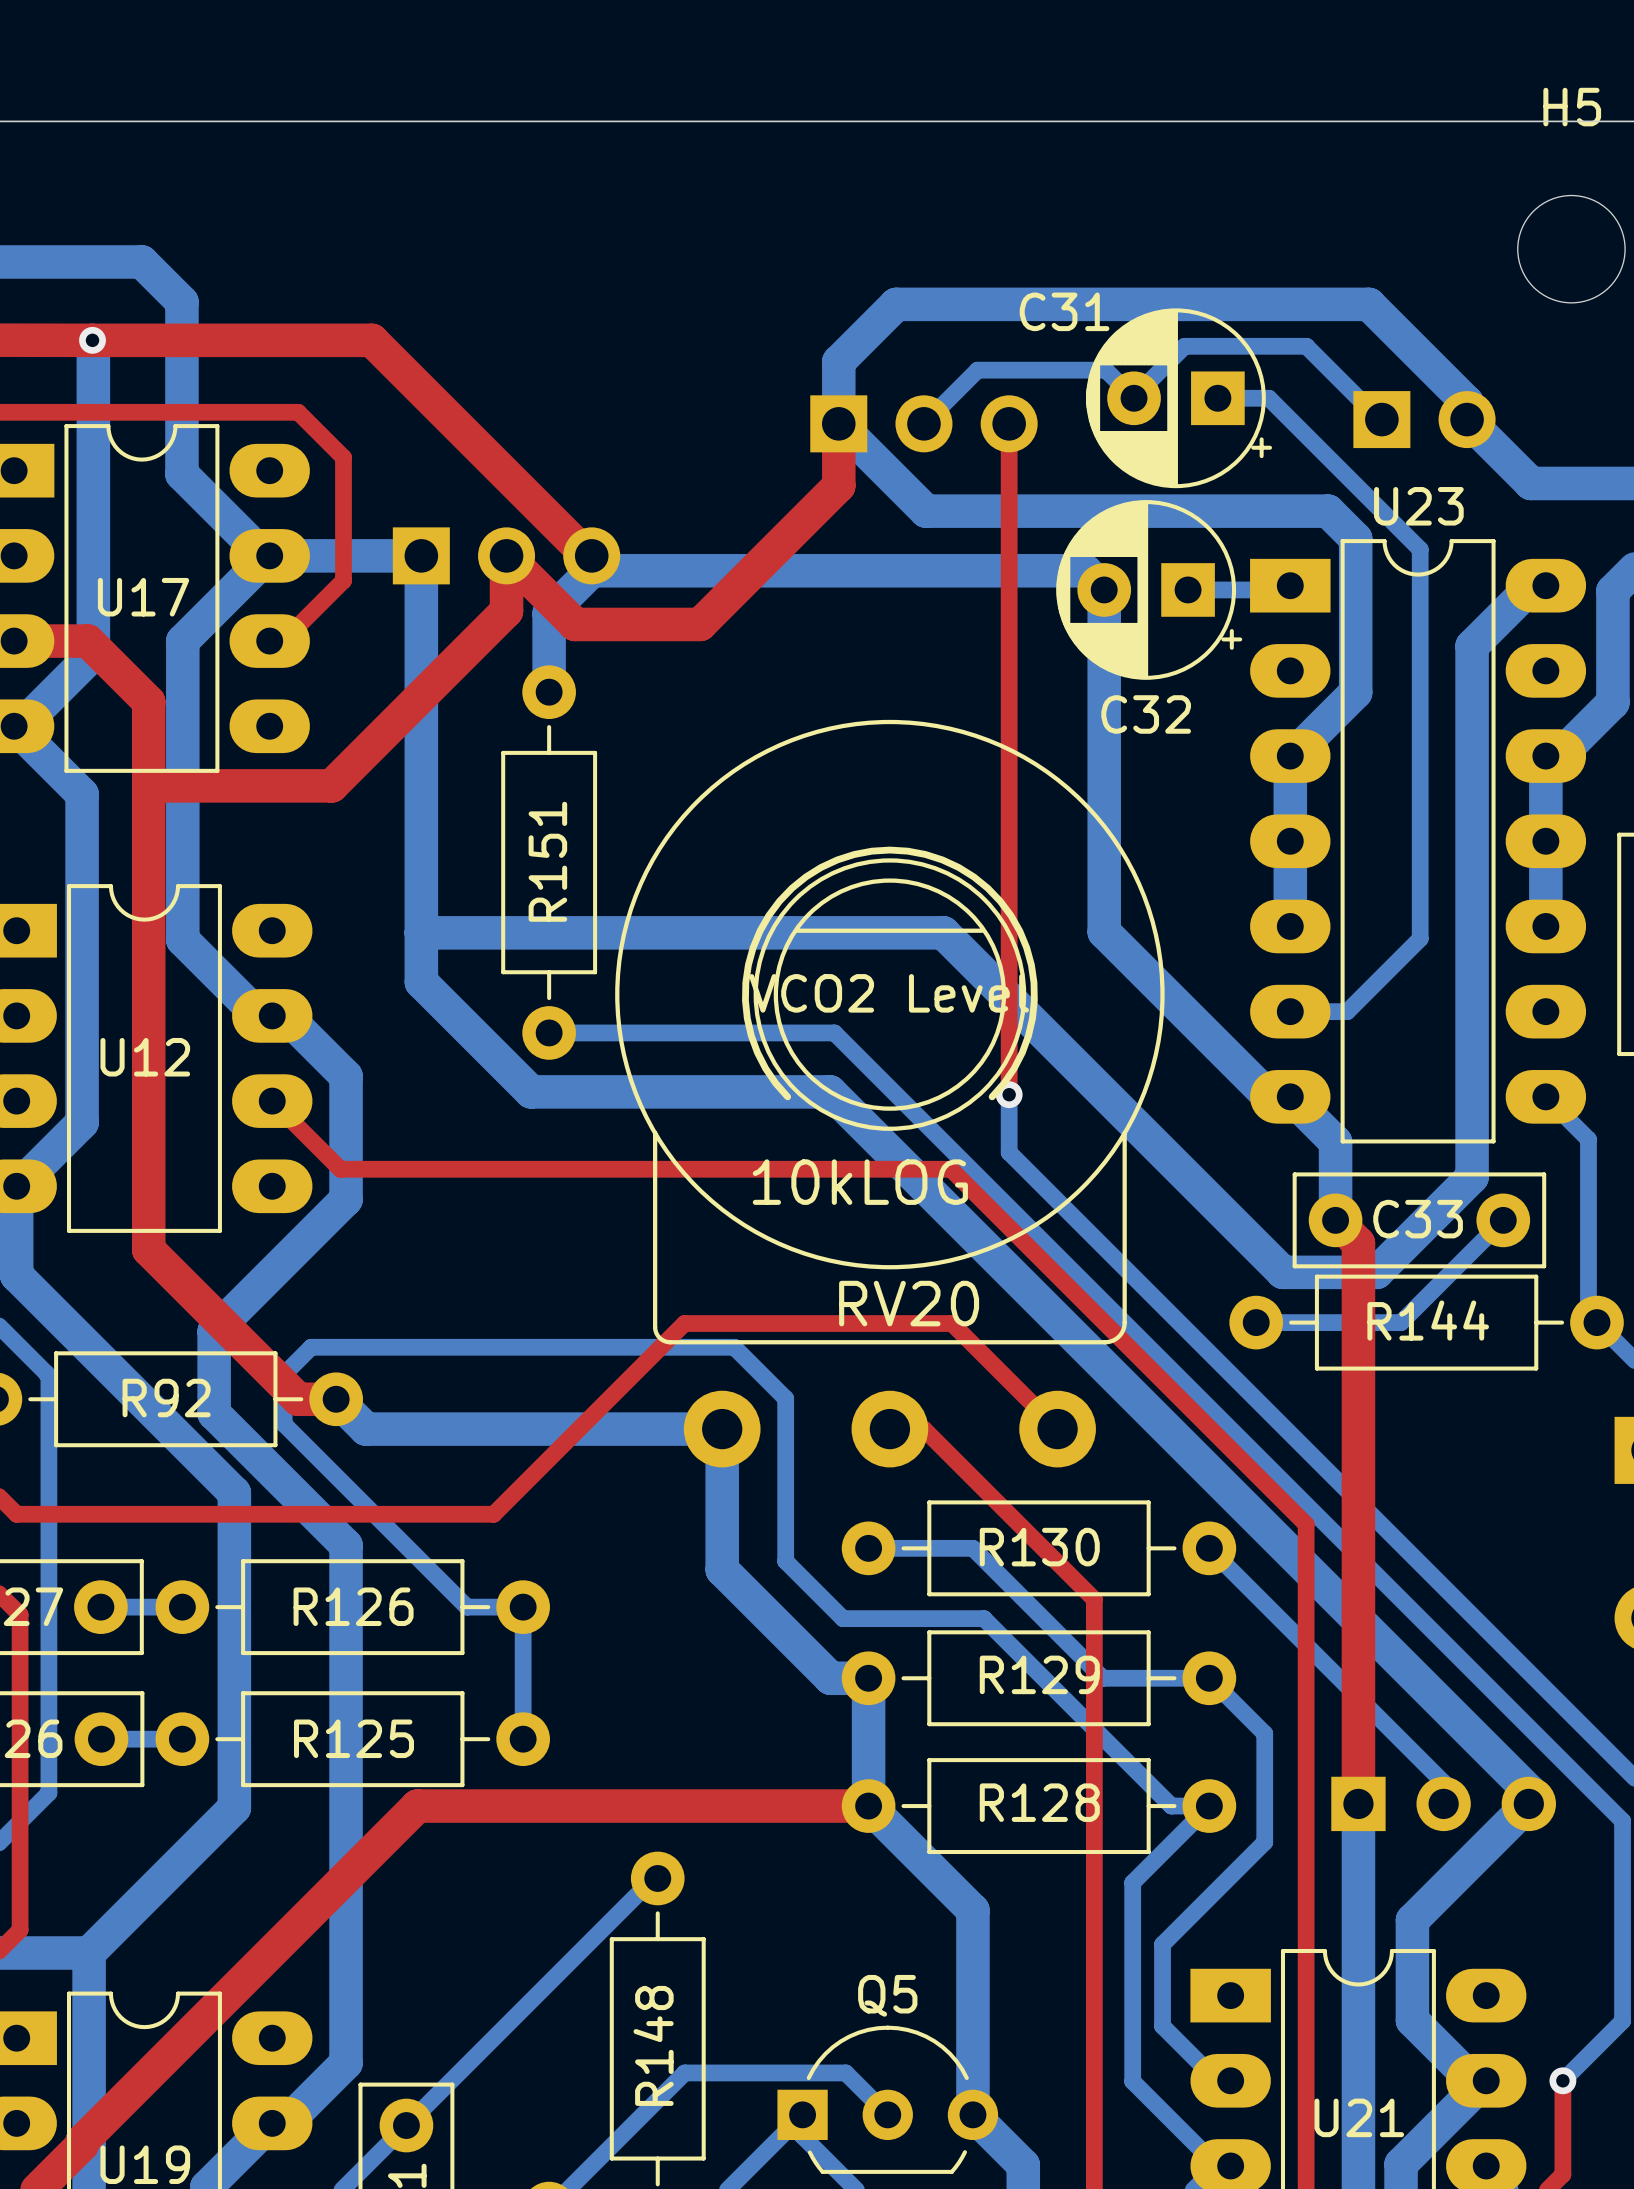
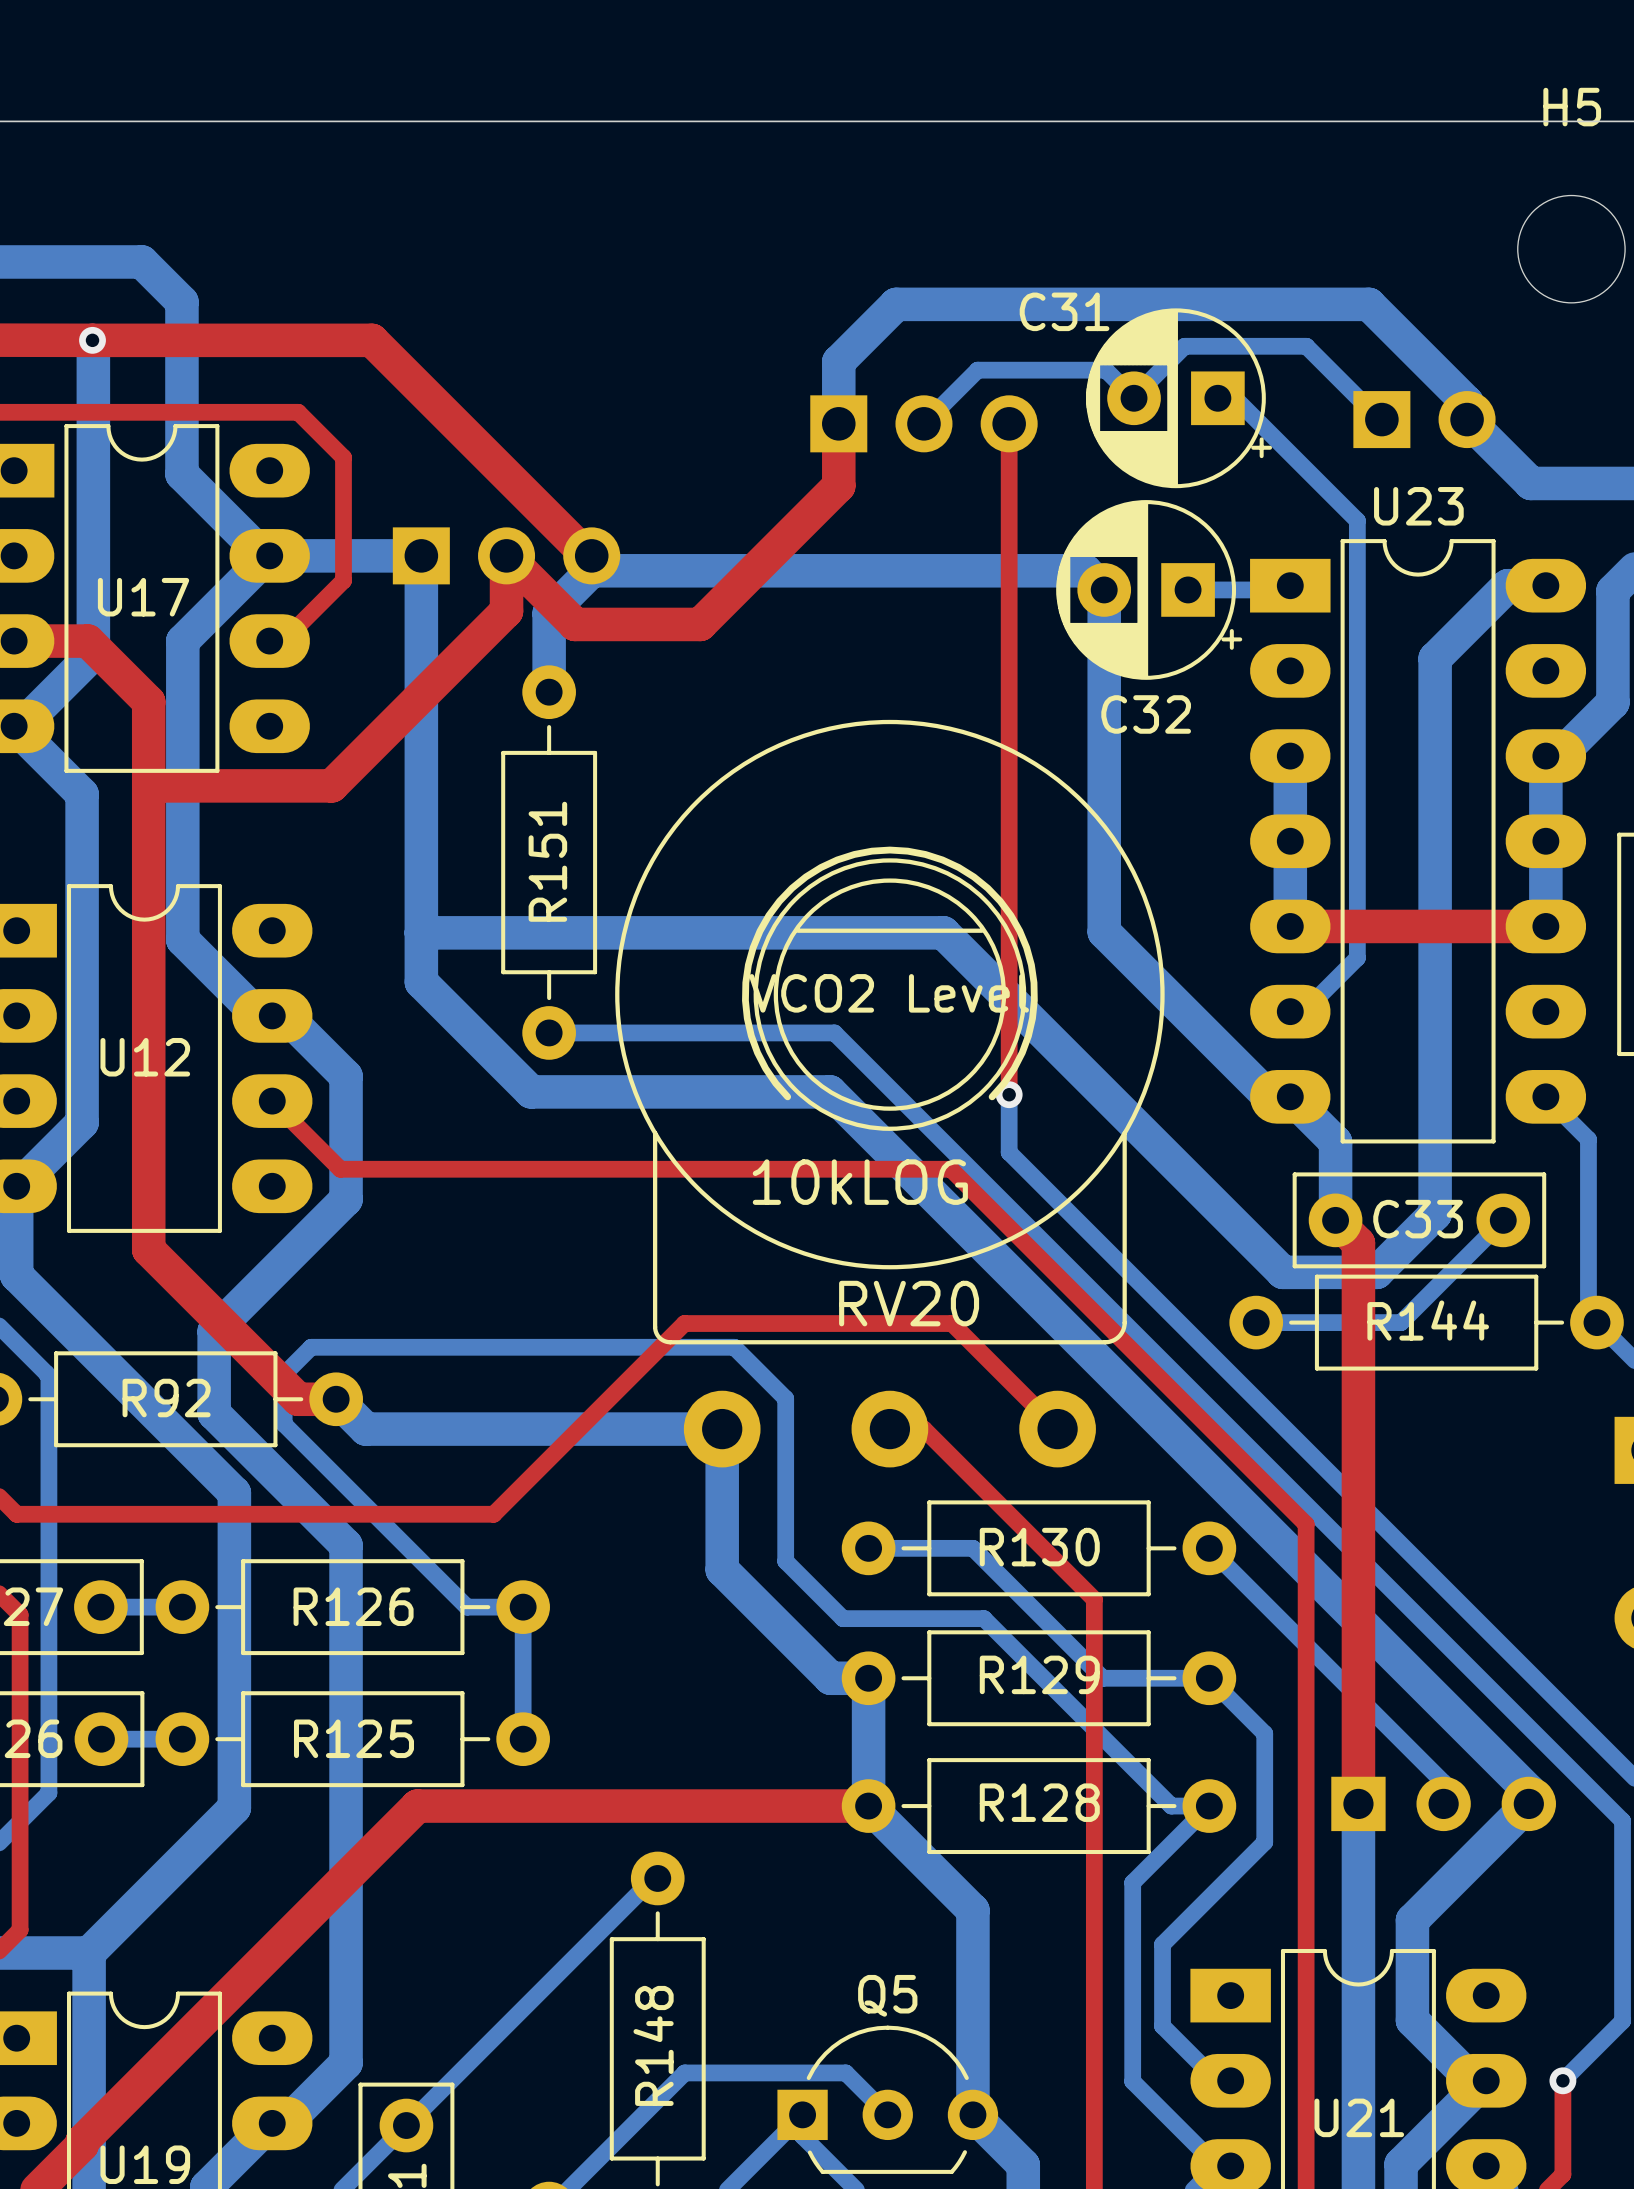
bottom track: (1234, 398) (1269, 398) (1420, 549) (1420, 938) (1347, 1011) (1303, 1011) -> (1234, 398) (1357, 520) (1357, 957) (1303, 1011)
bottom track: (838, 423) (926, 511) (1328, 511) (1355, 538) (1355, 692) (1290, 756) -> none
bottom track: (1532, 585) (1472, 646) (1472, 1177) (1435, 1213) -> (1532, 585) (1507, 585) (1435, 658) (1435, 1213)
top track: none -> (1290, 926) (1545, 926)

